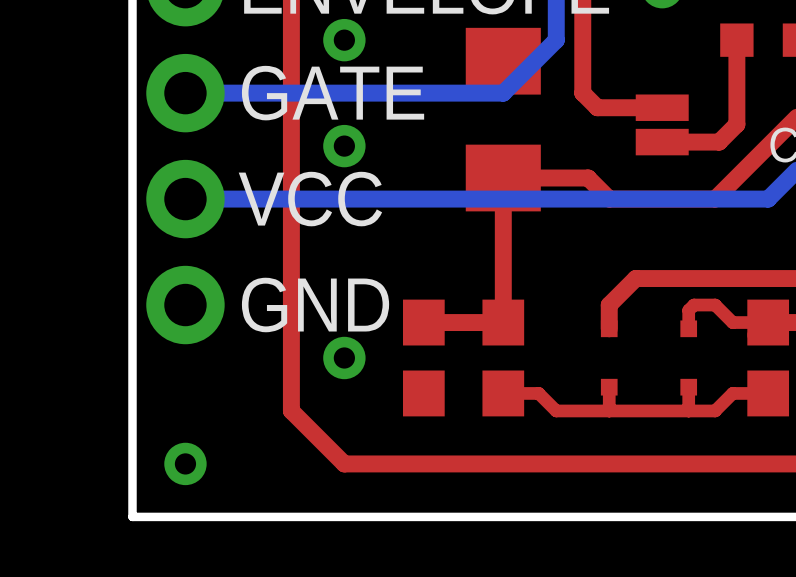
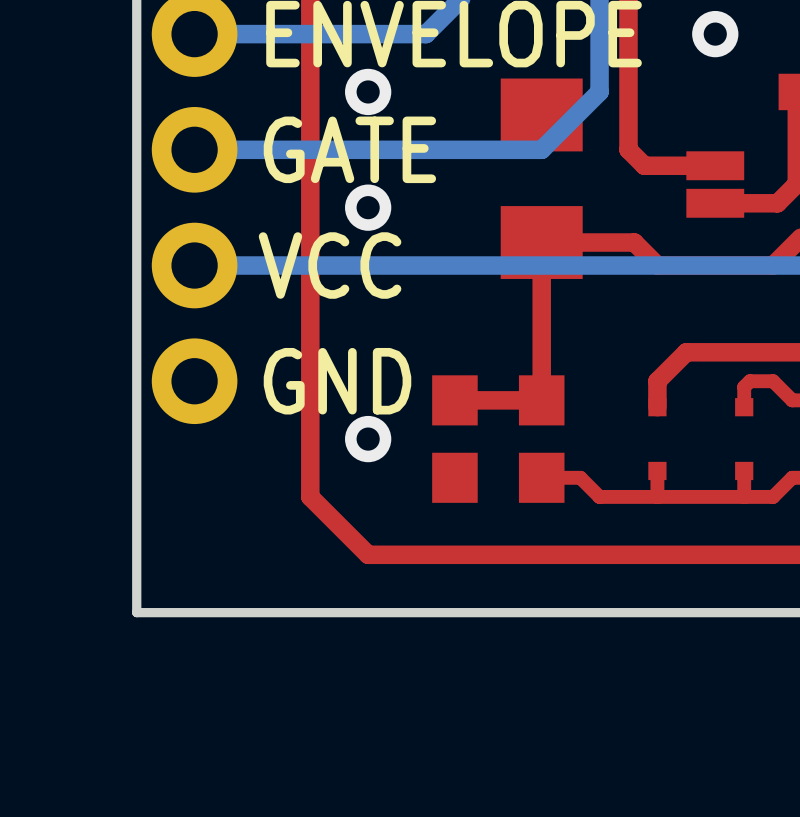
via: (185, 463) -> none

